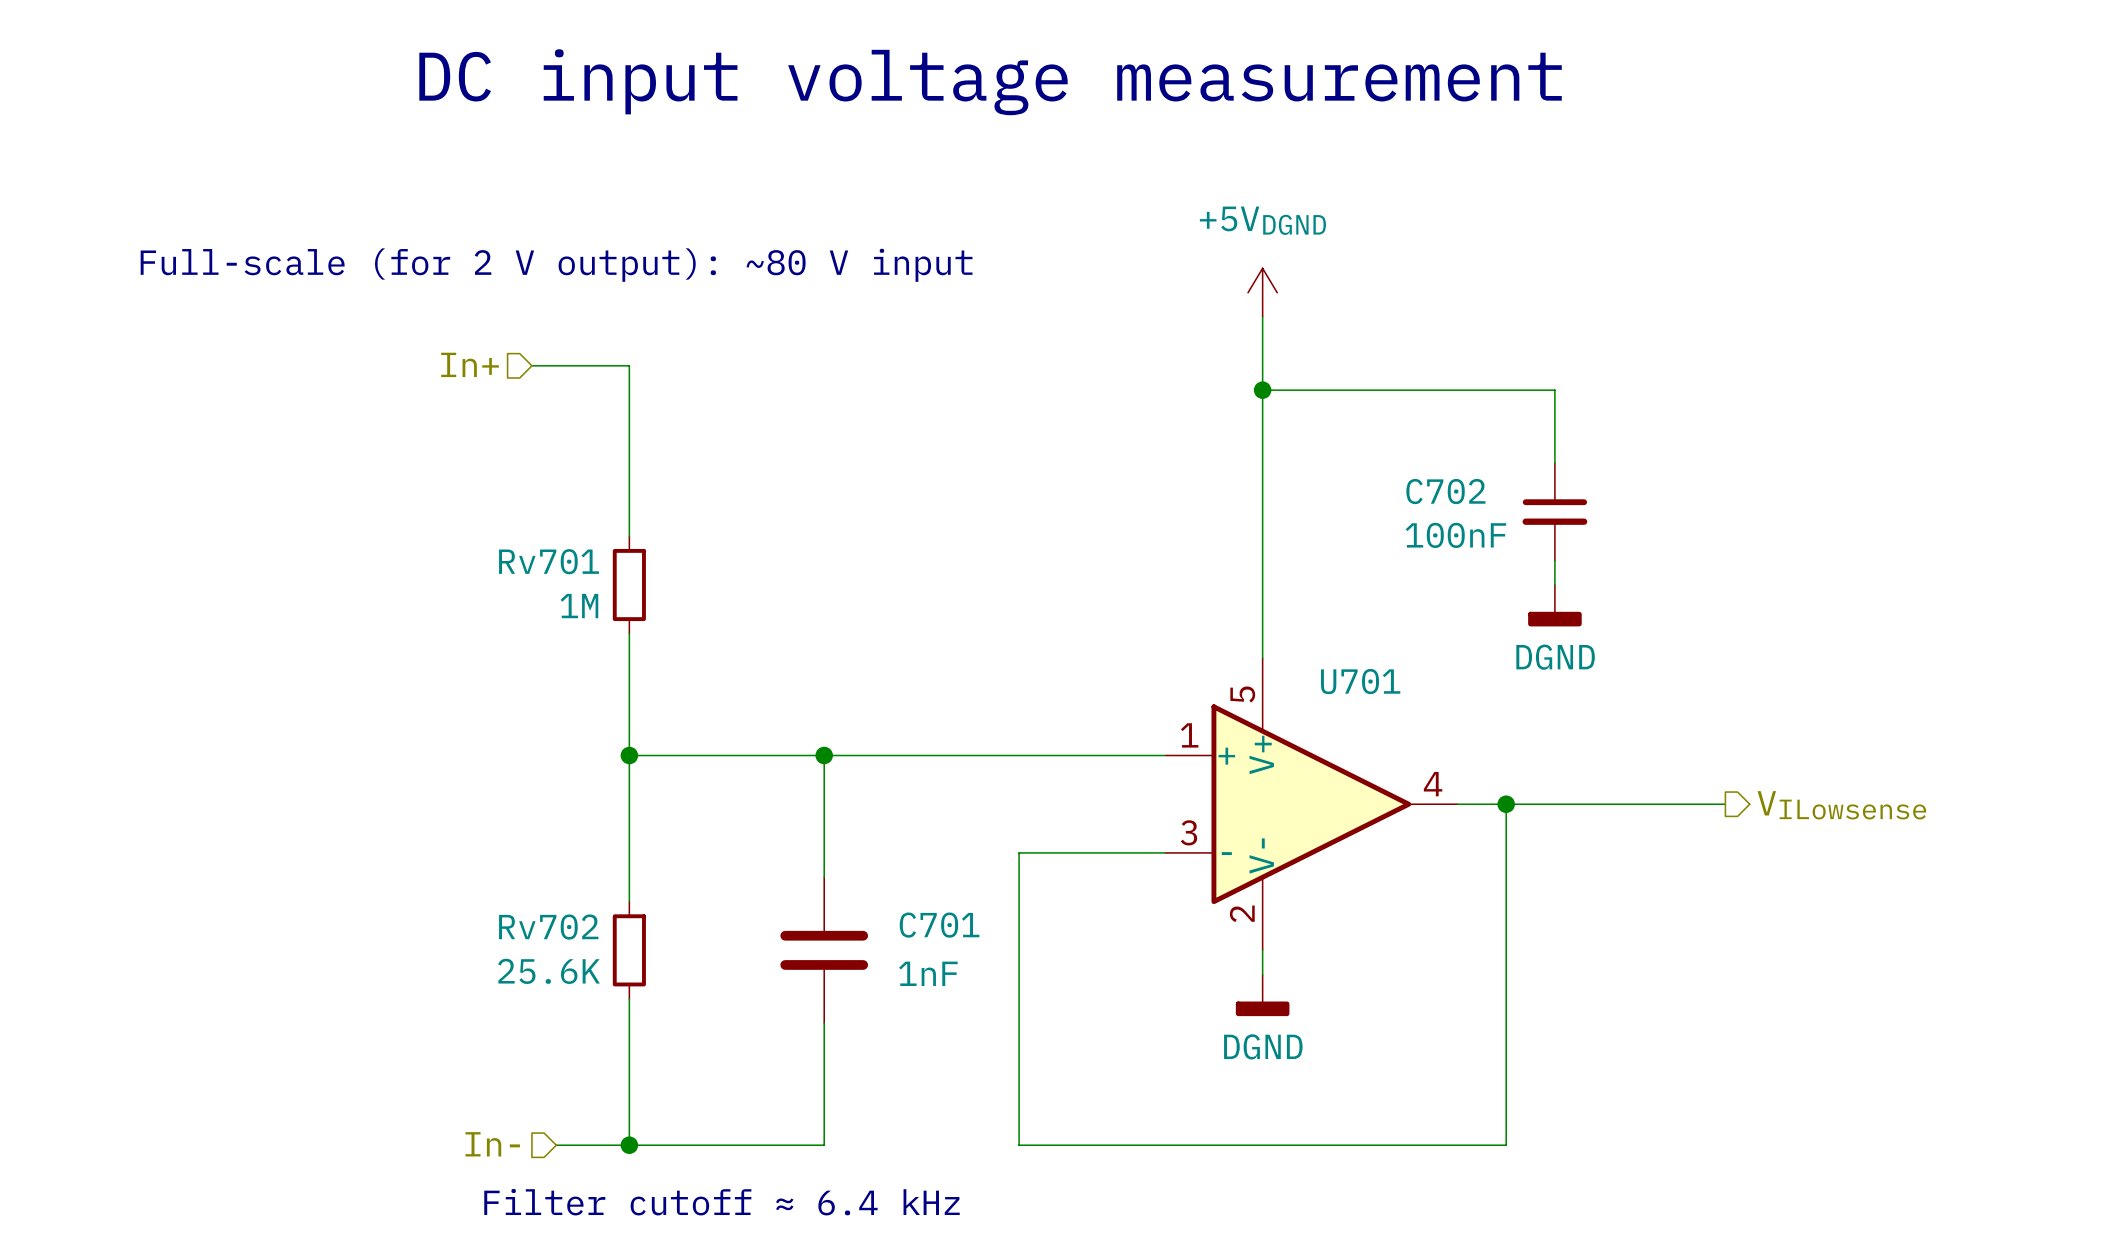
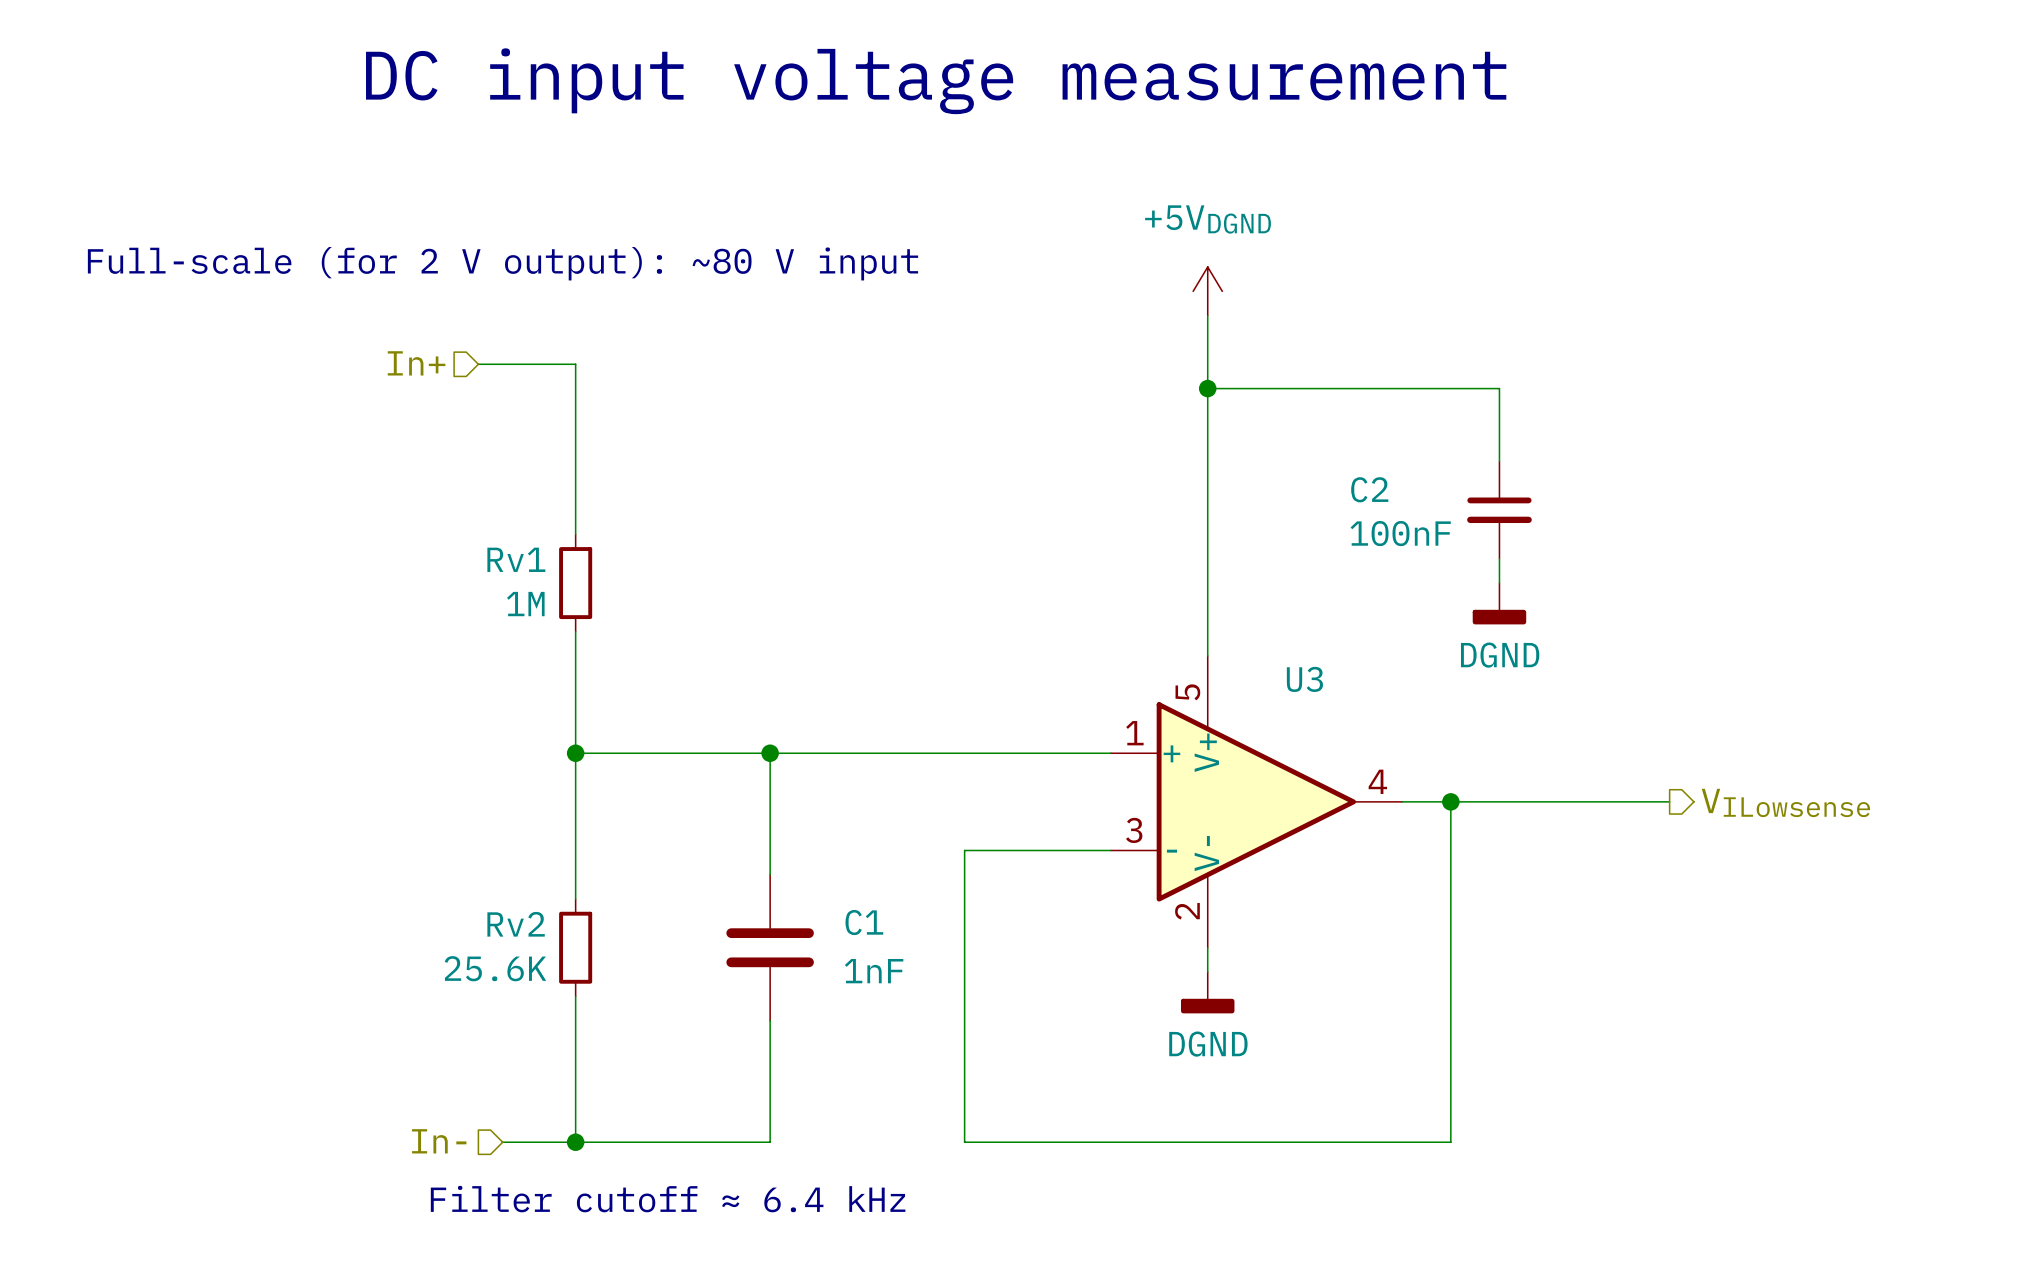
C702 name: C702 (1445, 491) -> C2 (1369, 489)
Rv701 name: Rv701 (549, 561) -> Rv1 (516, 559)
U701 name: U701 (1360, 681) -> U3 (1304, 679)
C701 name: C701 (939, 925) -> C1 (864, 922)
Rv702 name: Rv702 (548, 927) -> Rv2 (516, 924)

